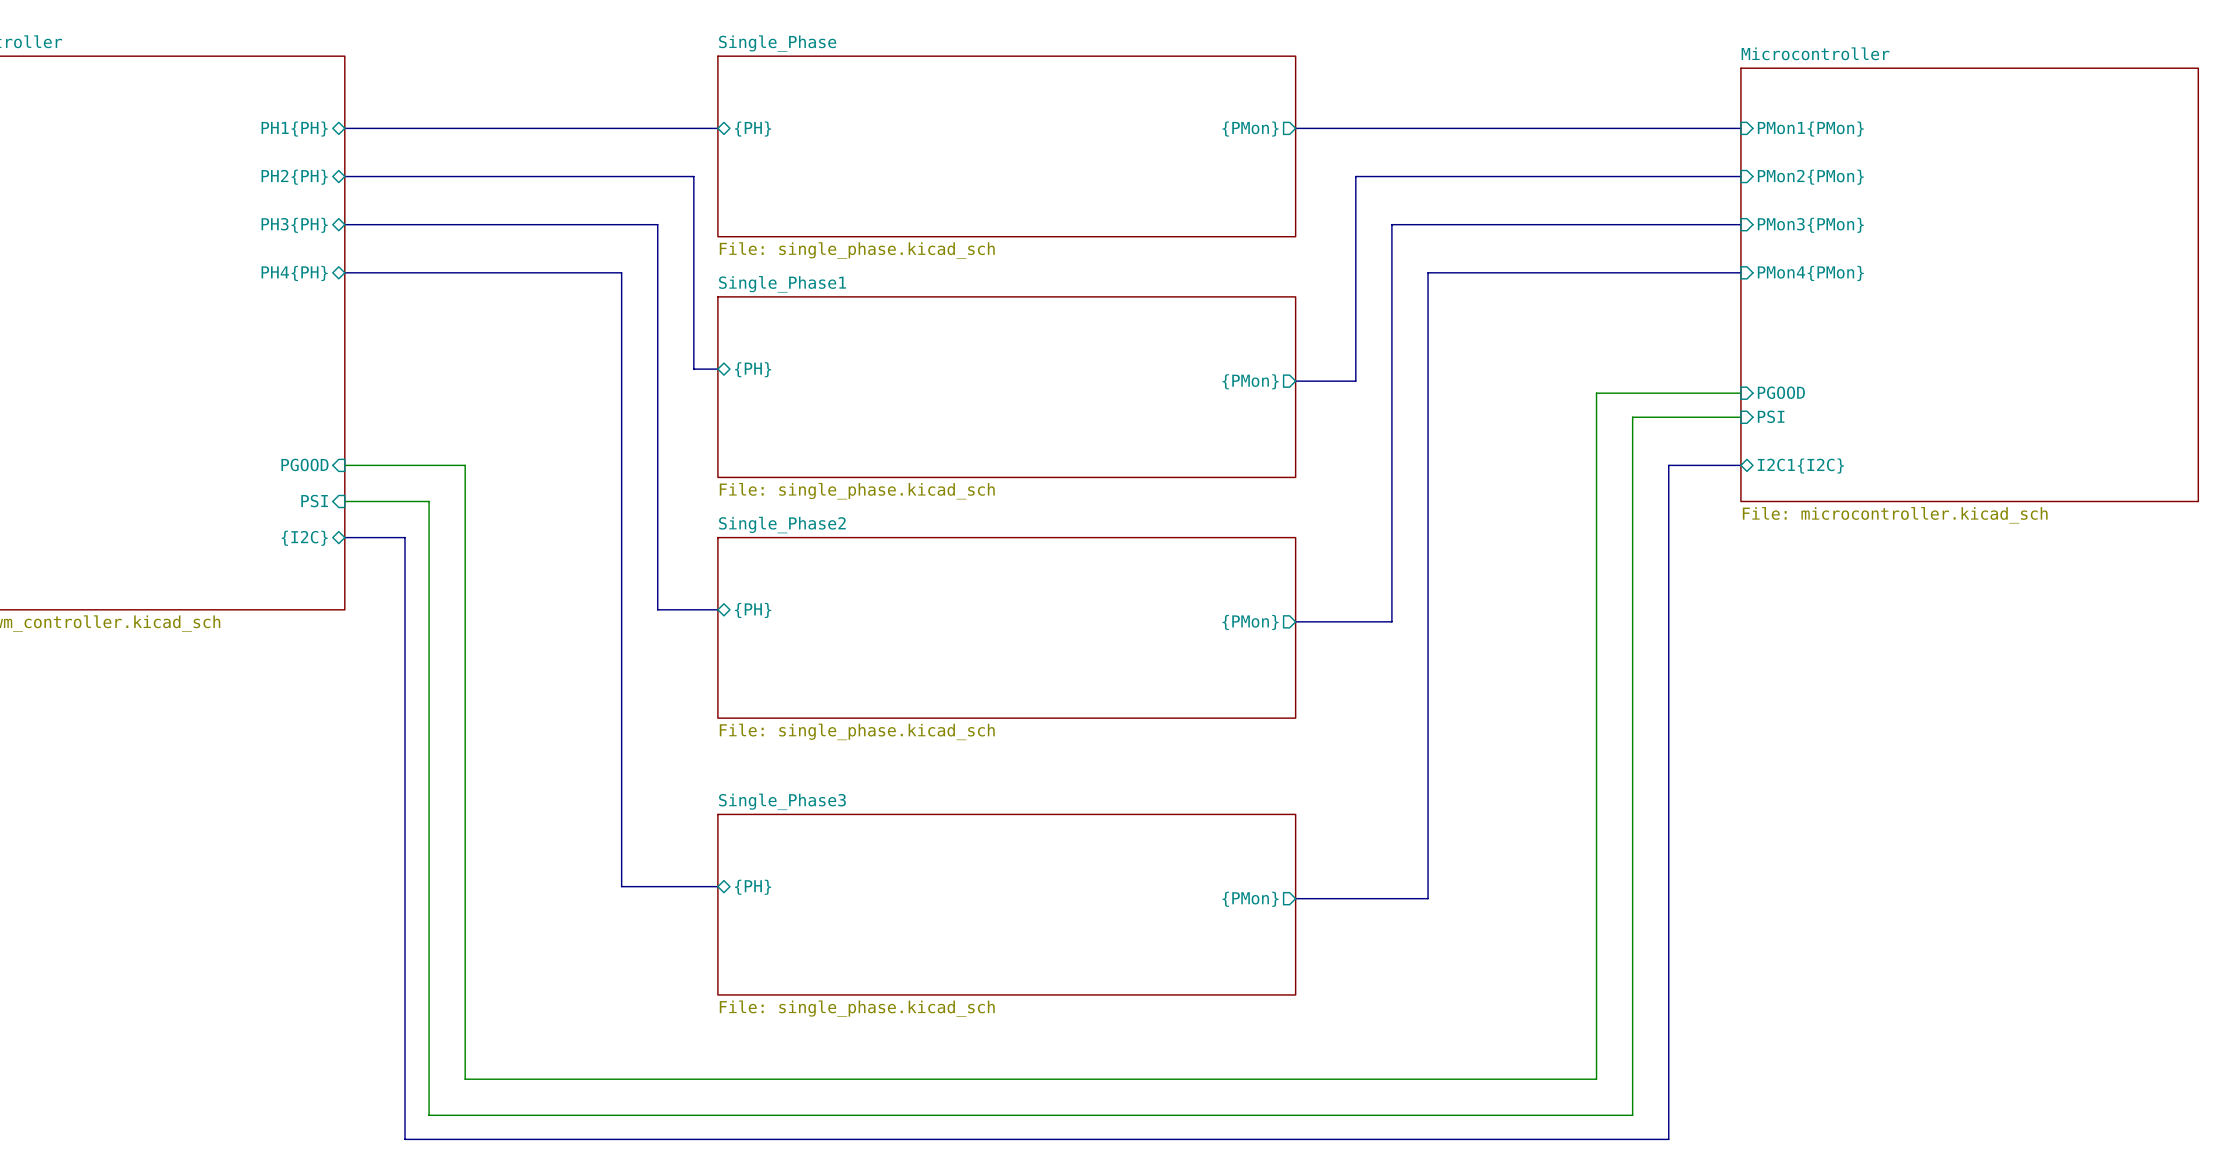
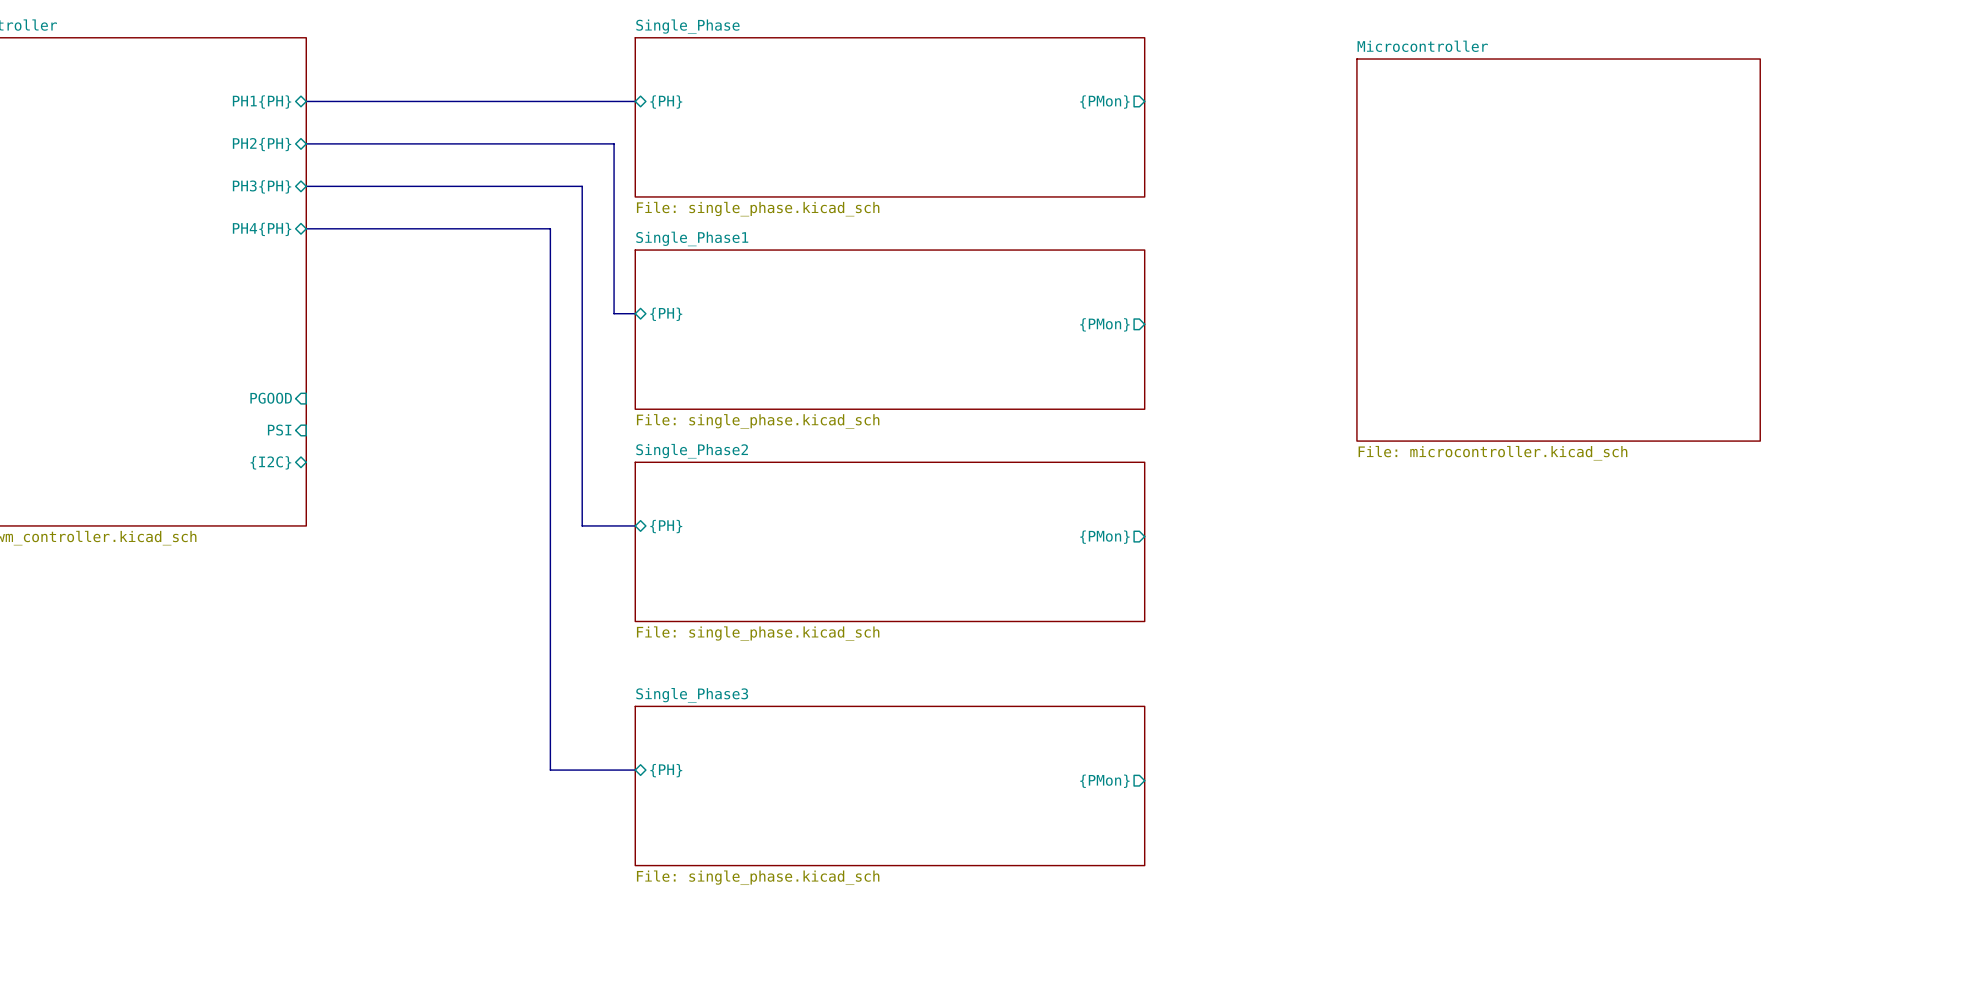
bus: (1295, 128) (1740, 128) -> none
sheet pin: PMon1{PMon} (1810, 129) -> none
bus: (1740, 176) (1355, 176) (1355, 381) (1295, 381) -> none
sheet pin: PMon2{PMon} (1810, 177) -> none
bus: (1740, 224) (1391, 224) (1391, 621) (1295, 621) -> none
sheet pin: PMon3{PMon} (1810, 225) -> none
bus: (1740, 272) (1428, 272) (1428, 898) (1295, 898) -> none
sheet pin: PMon4{PMon} (1810, 273) -> none
sheet Microcontroller position: (1969, 284) -> (1558, 250)
sheet pin: PGOOD (1781, 392) -> none
wire: (1740, 393) (1596, 393) (1596, 1079) (465, 1079) (465, 465) (344, 465) -> none
sheet pin: PSI (1771, 416) -> none
wire: (1740, 417) (1632, 417) (1632, 1115) (429, 1115) (429, 501) (344, 501) -> none
bus: (1740, 465) (1668, 465) (1668, 1139) (404, 1139) (404, 537) (344, 537) -> none
sheet pin: I2C1{I2C} (1800, 466) -> none

